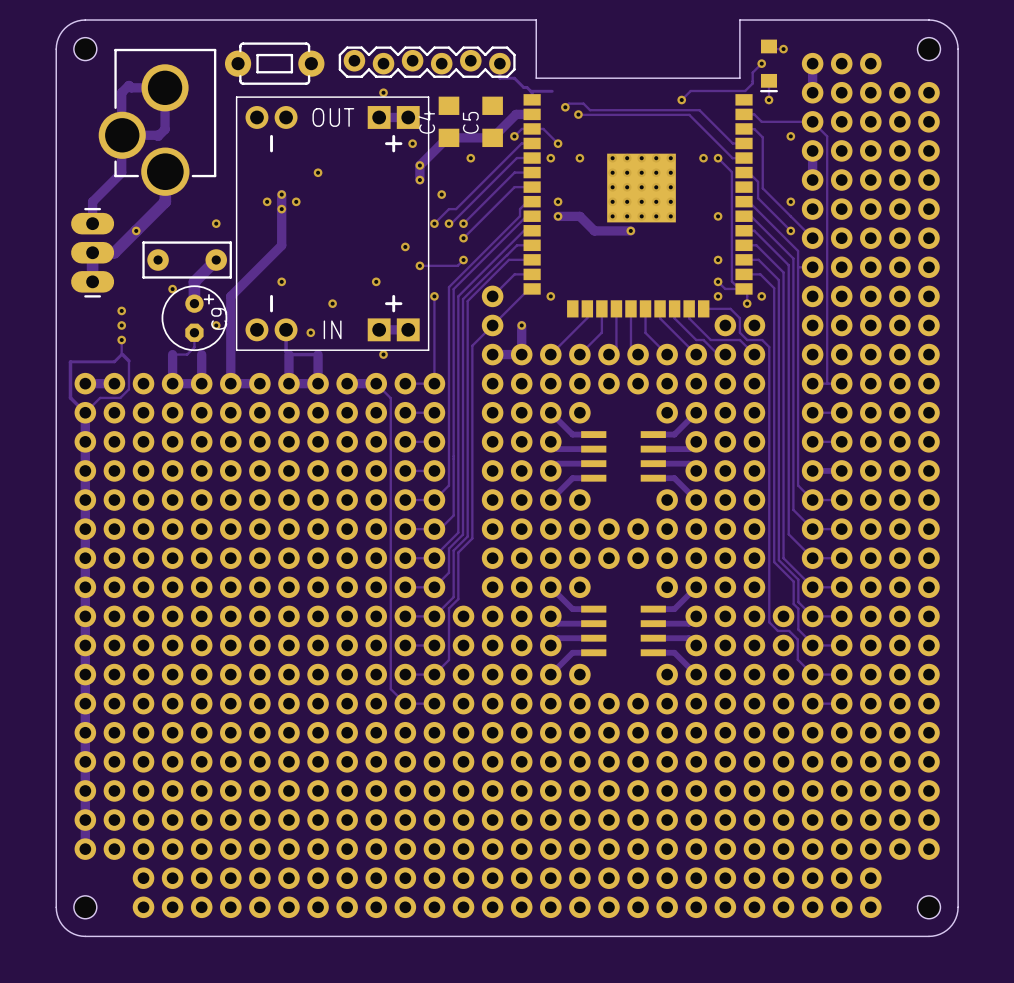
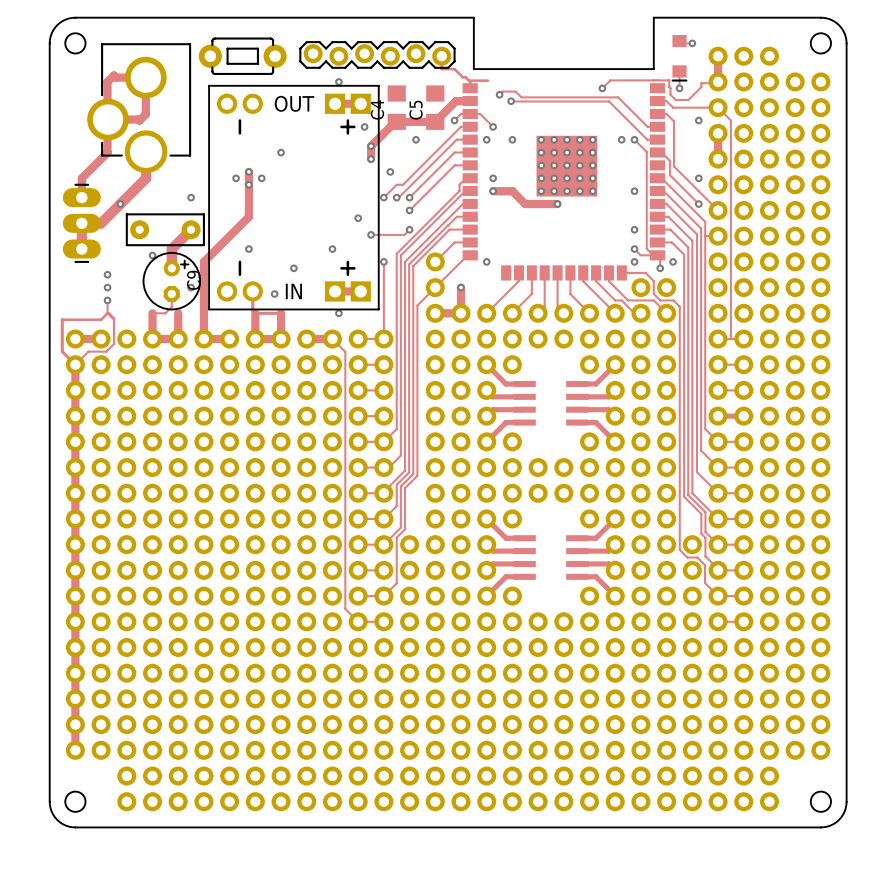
track: (761, 63) (752, 72) (752, 83) (745, 91) -> (718, 81) (701, 83) (701, 87) (688, 99) (675, 99) (670, 94) (669, 80) (658, 80)
via: (761, 63) -> none

